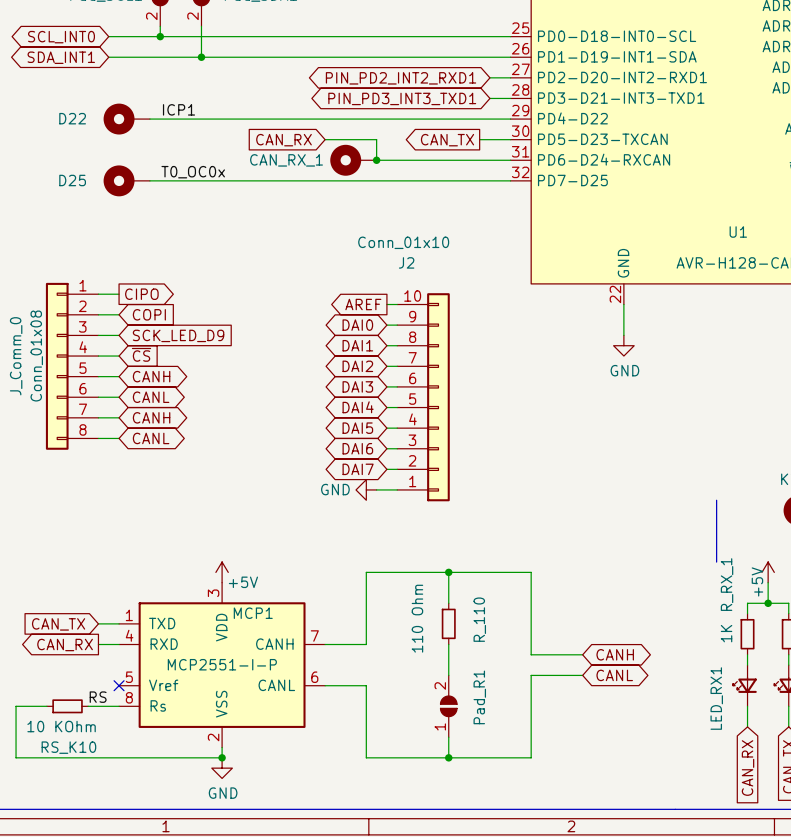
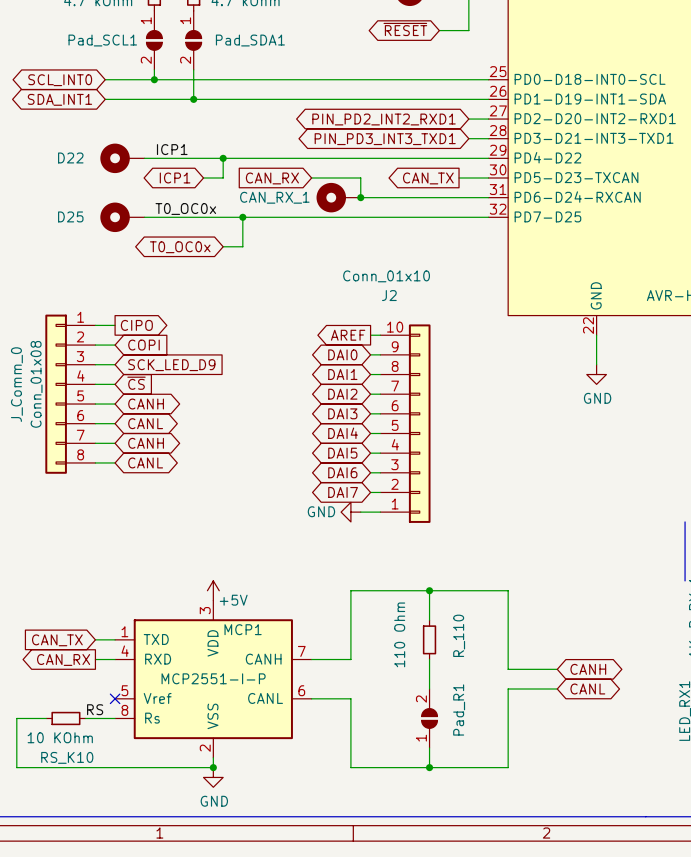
wire: none -> (223, 158) (223, 177) (203, 177)
junction: none -> (223, 158)
global label: none -> ICP1 (175, 177)
wire: none -> (242, 217) (242, 246) (223, 246)
junction: none -> (242, 217)
global label: none -> T0_OC0x (180, 247)

